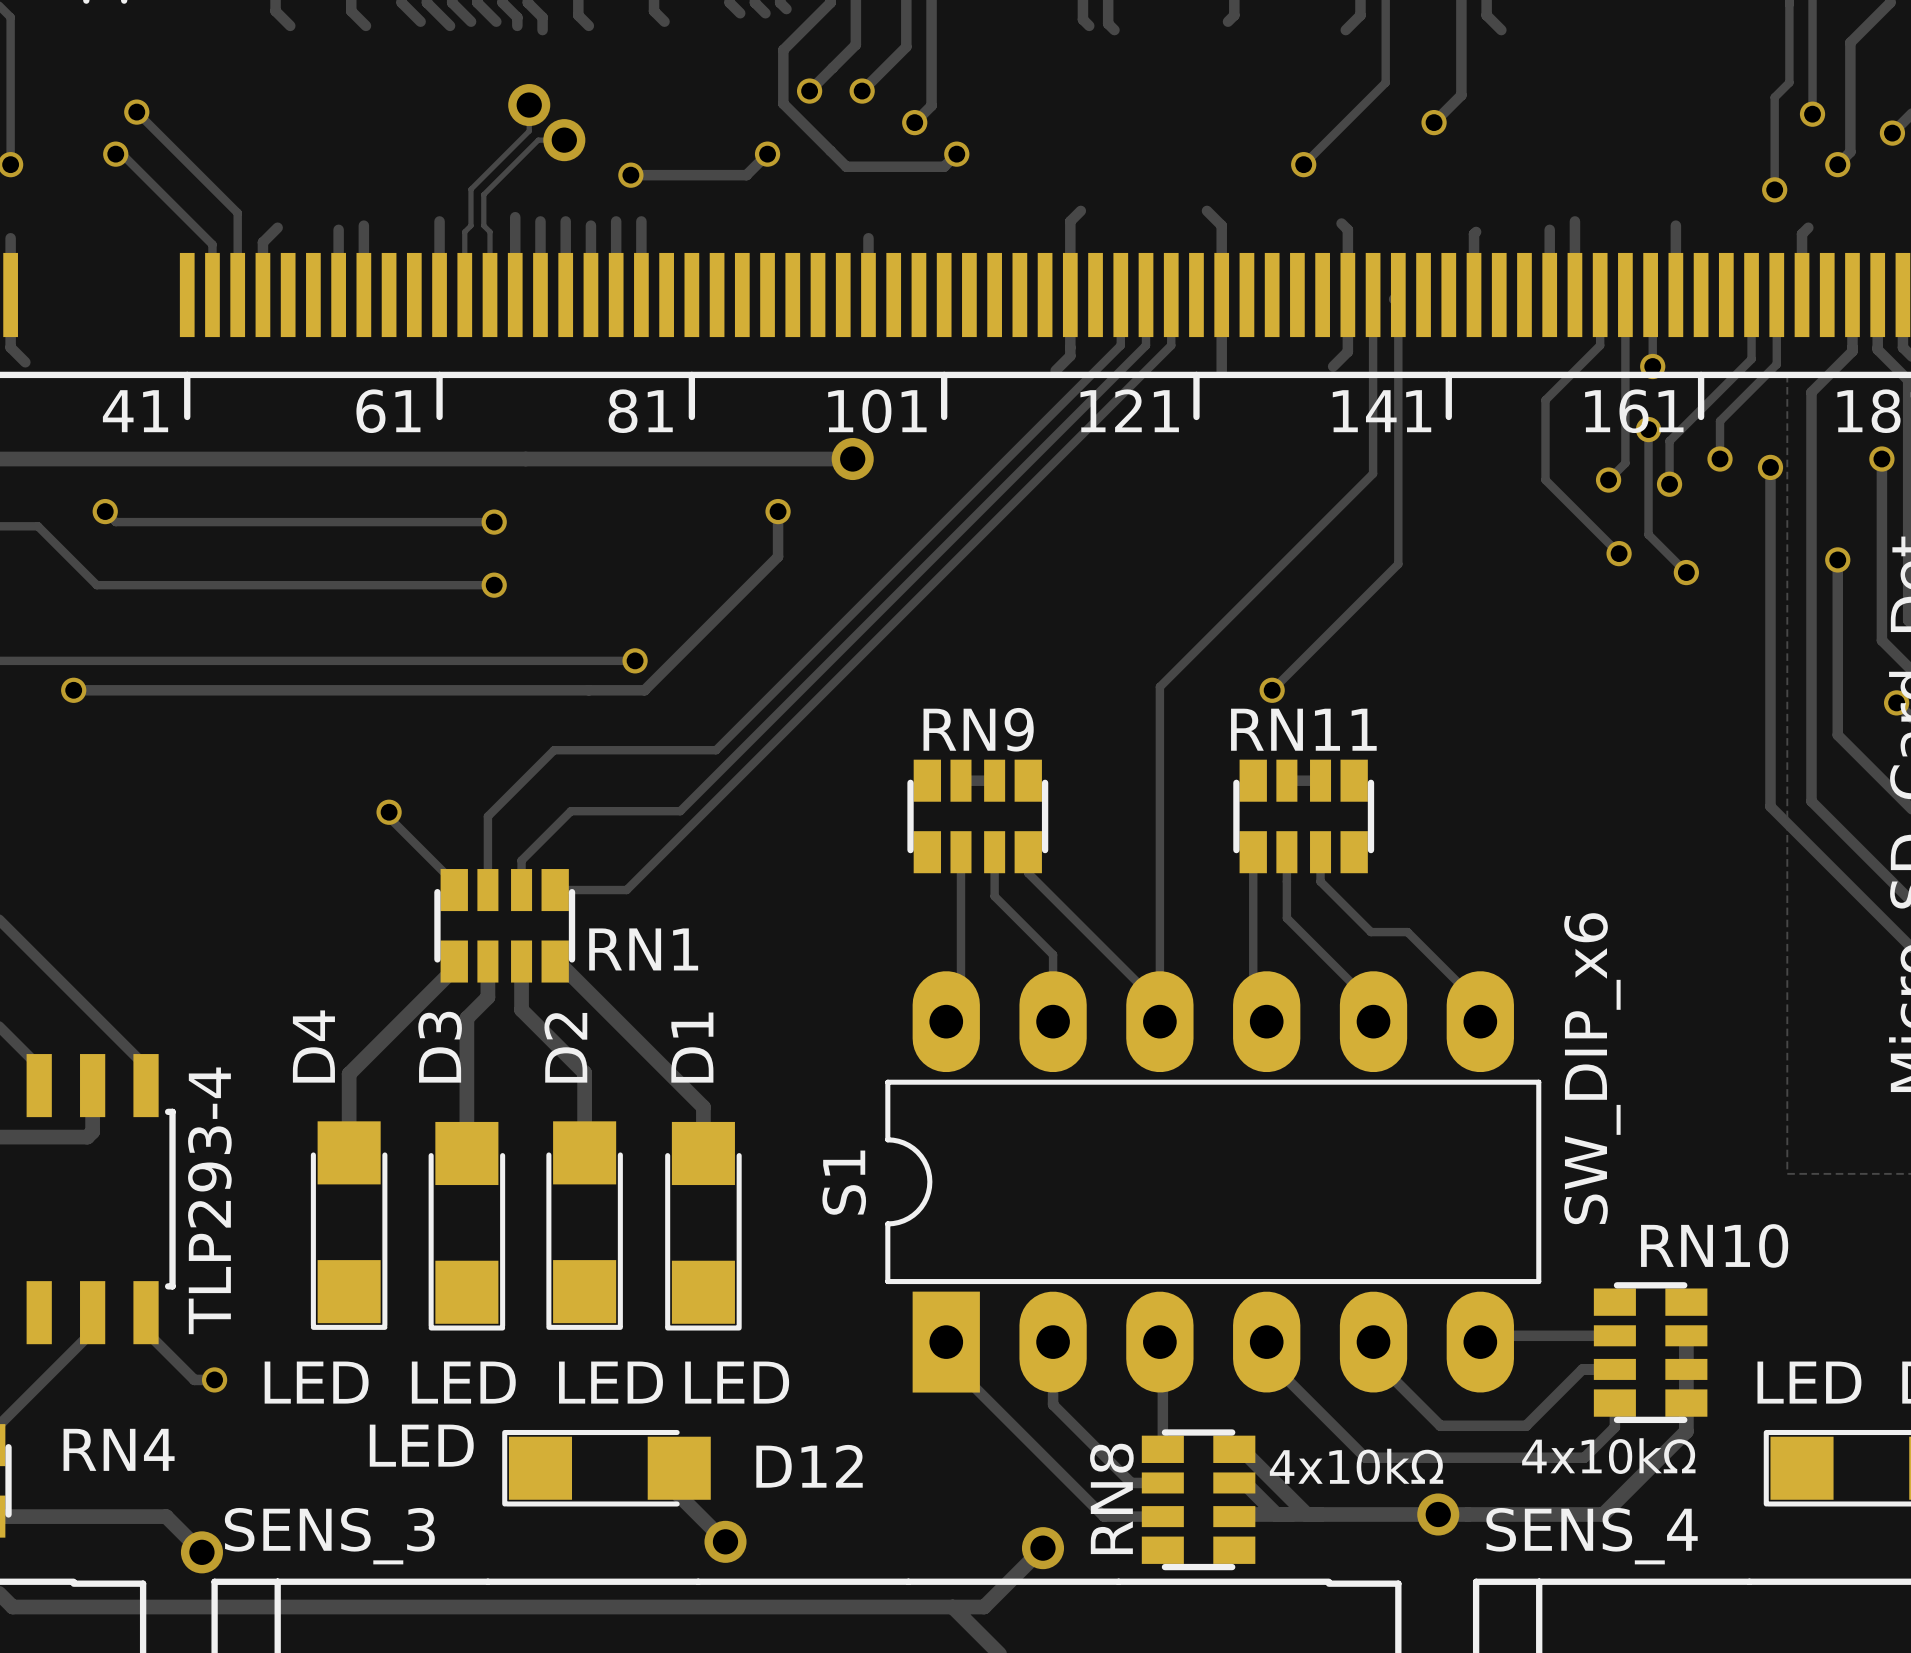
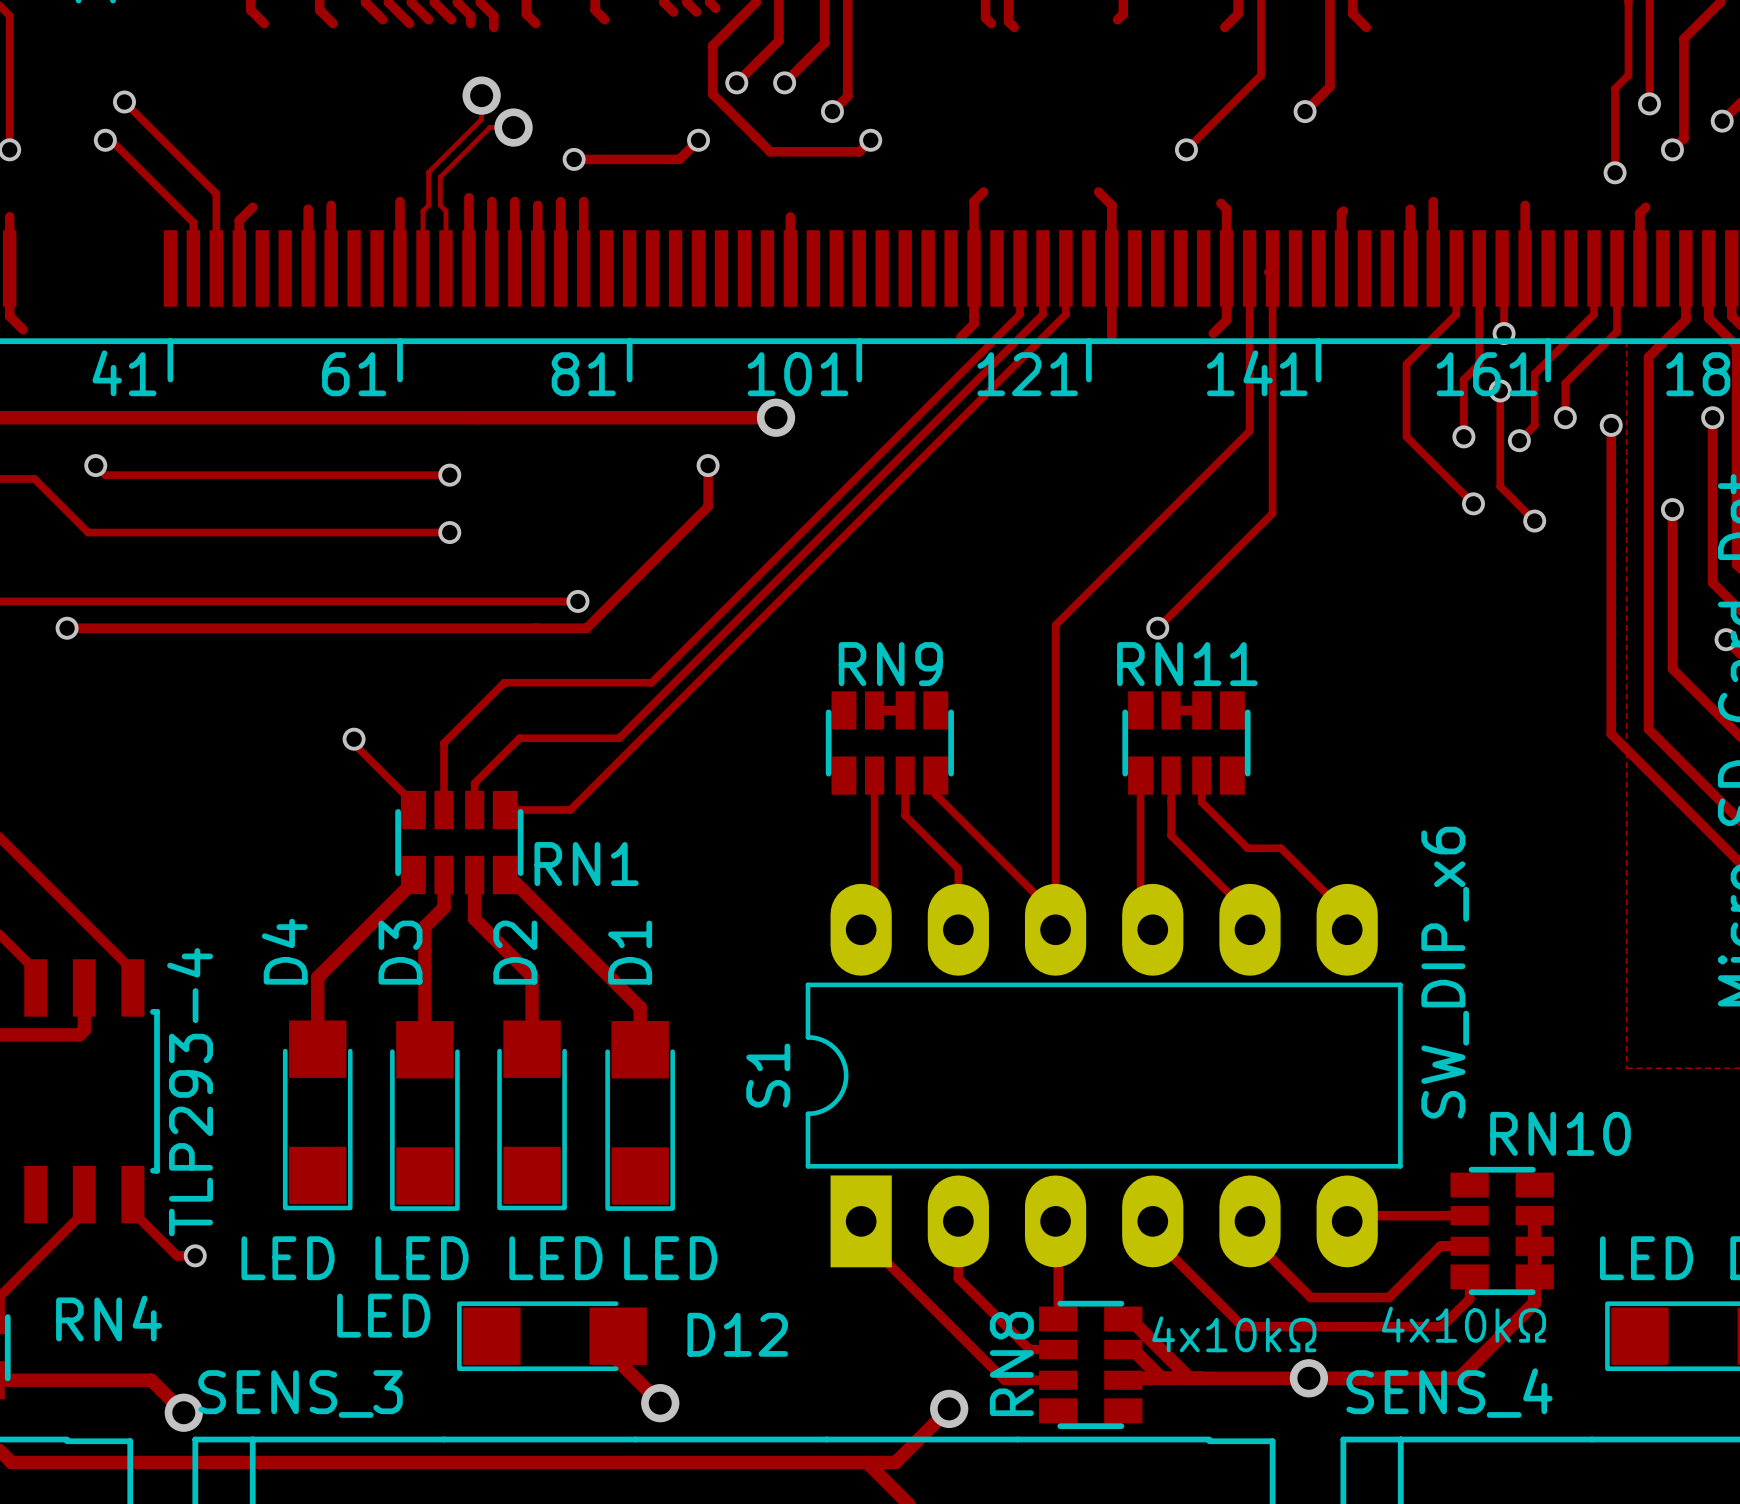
track: (1751, 345) (1751, 359) (1669, 441) (1669, 484) -> (1594, 314) (1534, 373) (1534, 425) (1527, 433)
track: (1625, 400) (1625, 463) (1608, 480) -> (1479, 364) (1463, 379) (1463, 436)

